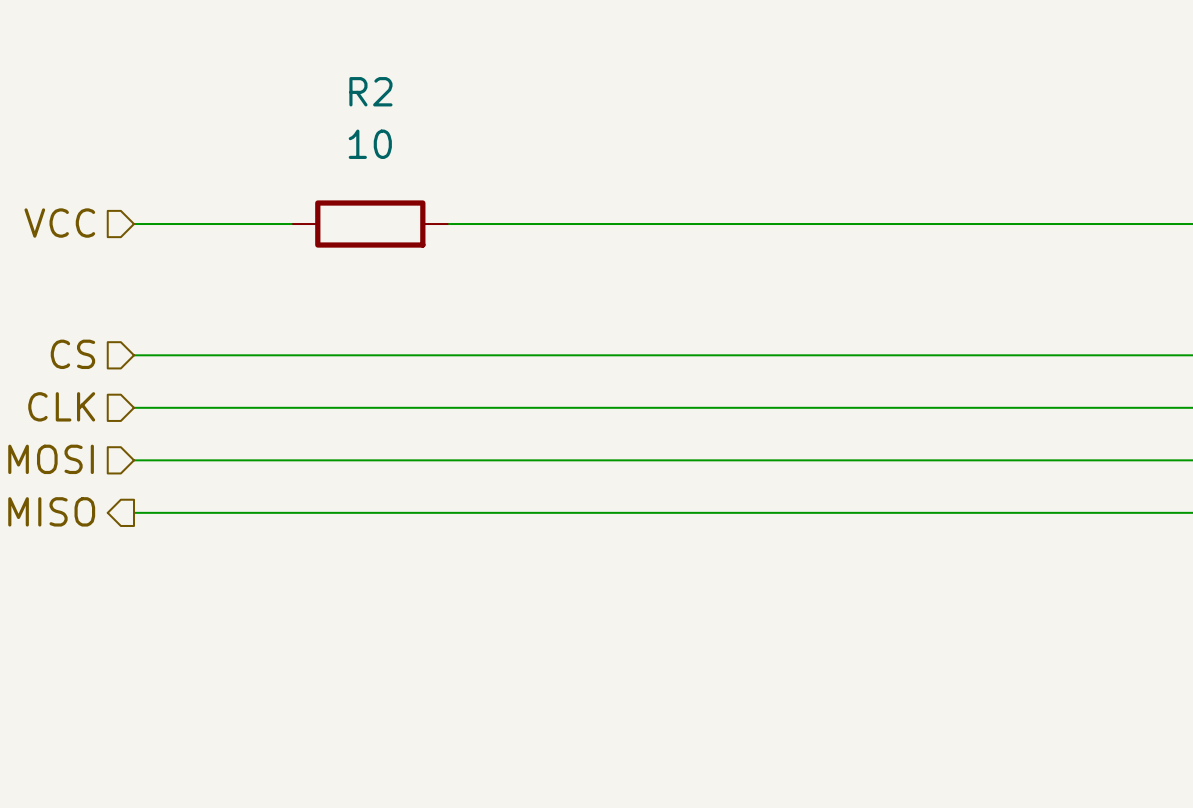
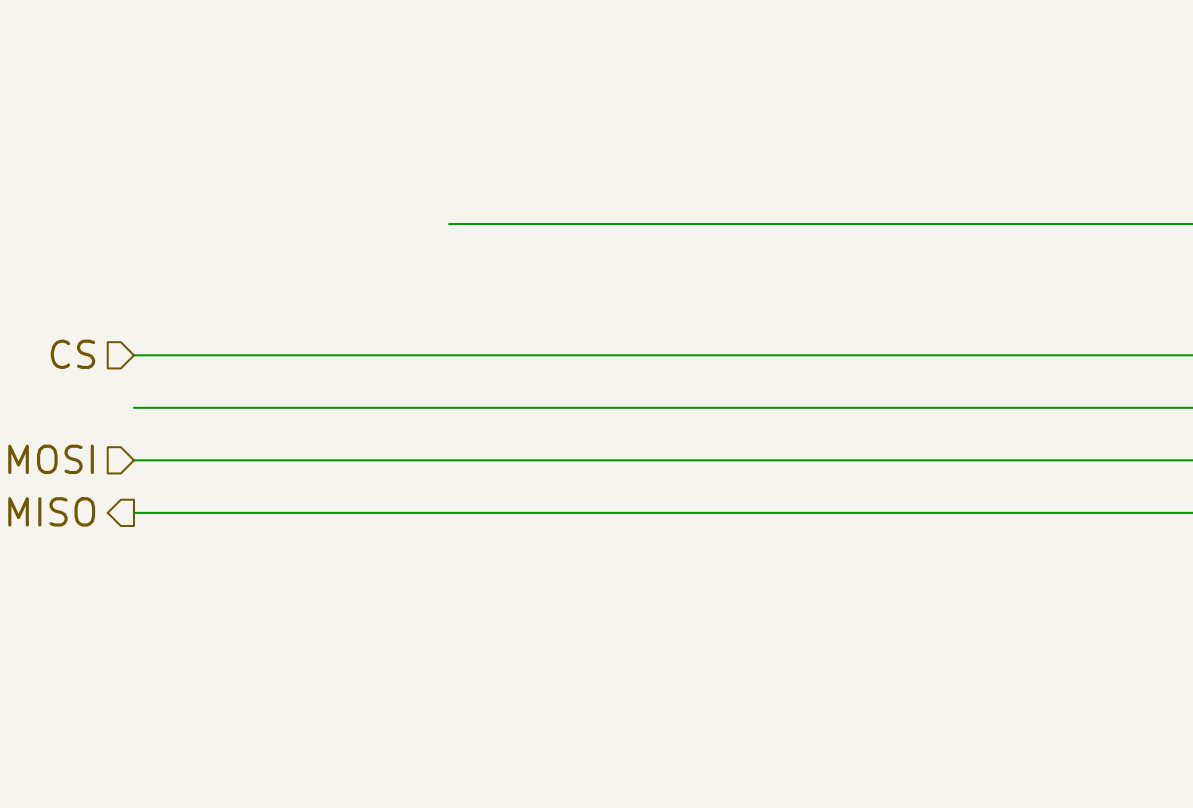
hierarchical label: VCC (59, 223) -> none
wire: (134, 224) (291, 224) -> none
R2: 10 (370, 224) -> none
hierarchical label: CLK (61, 406) -> none

